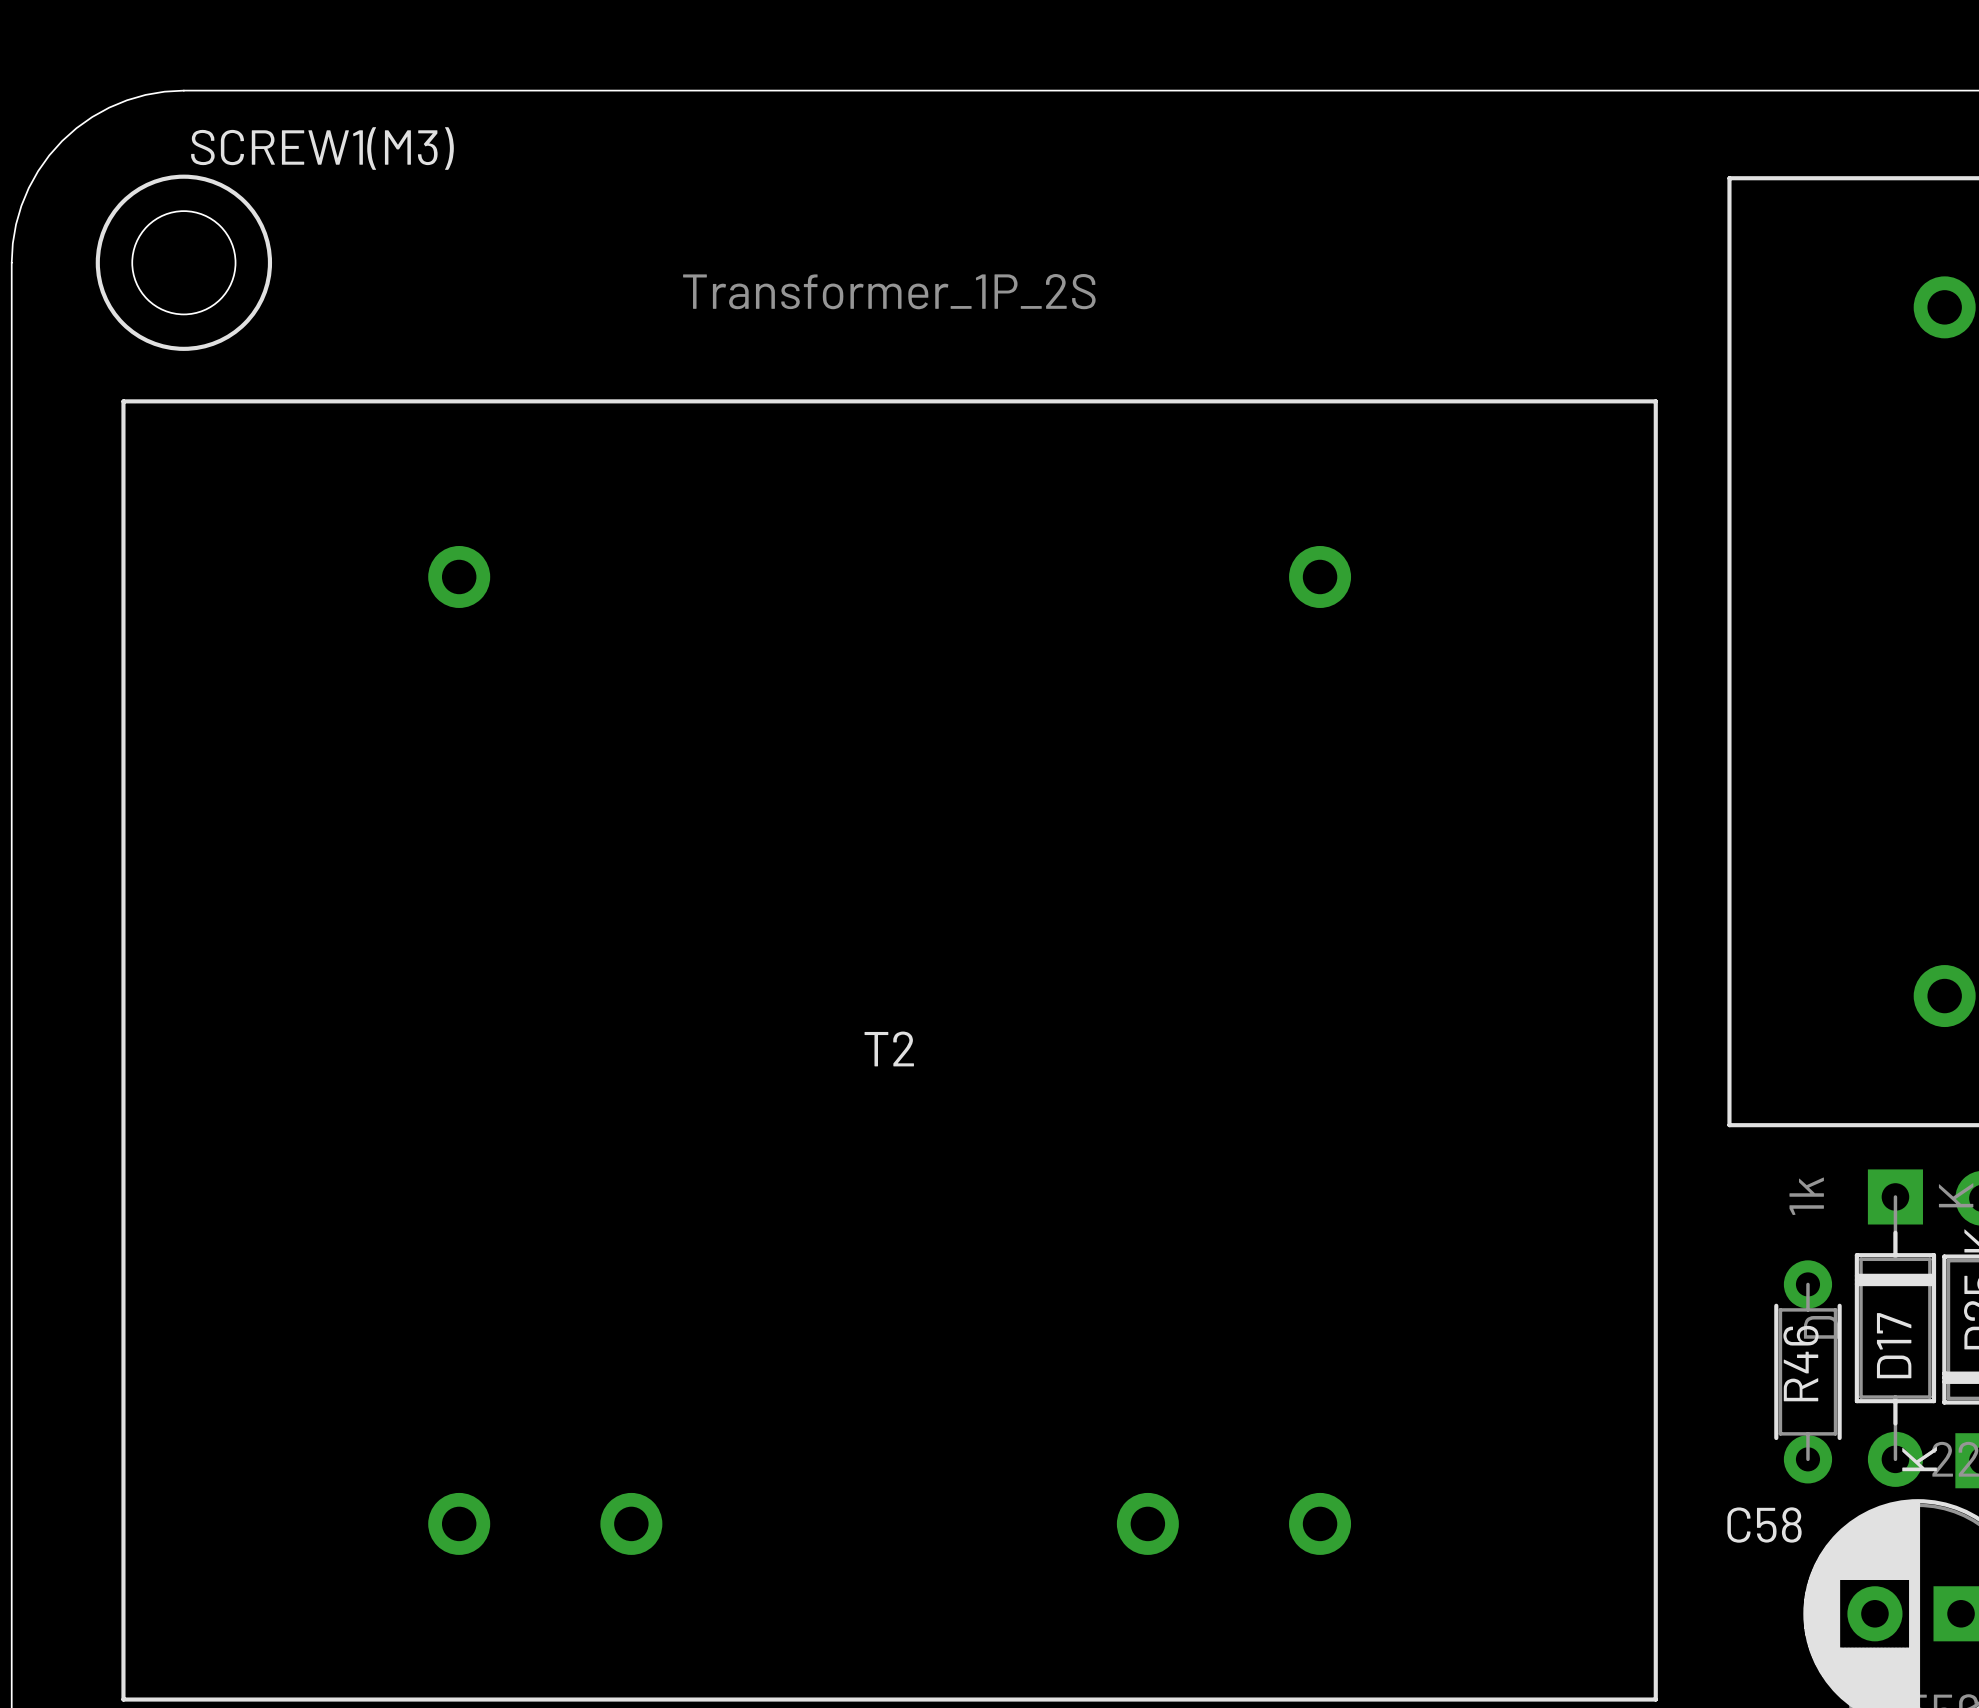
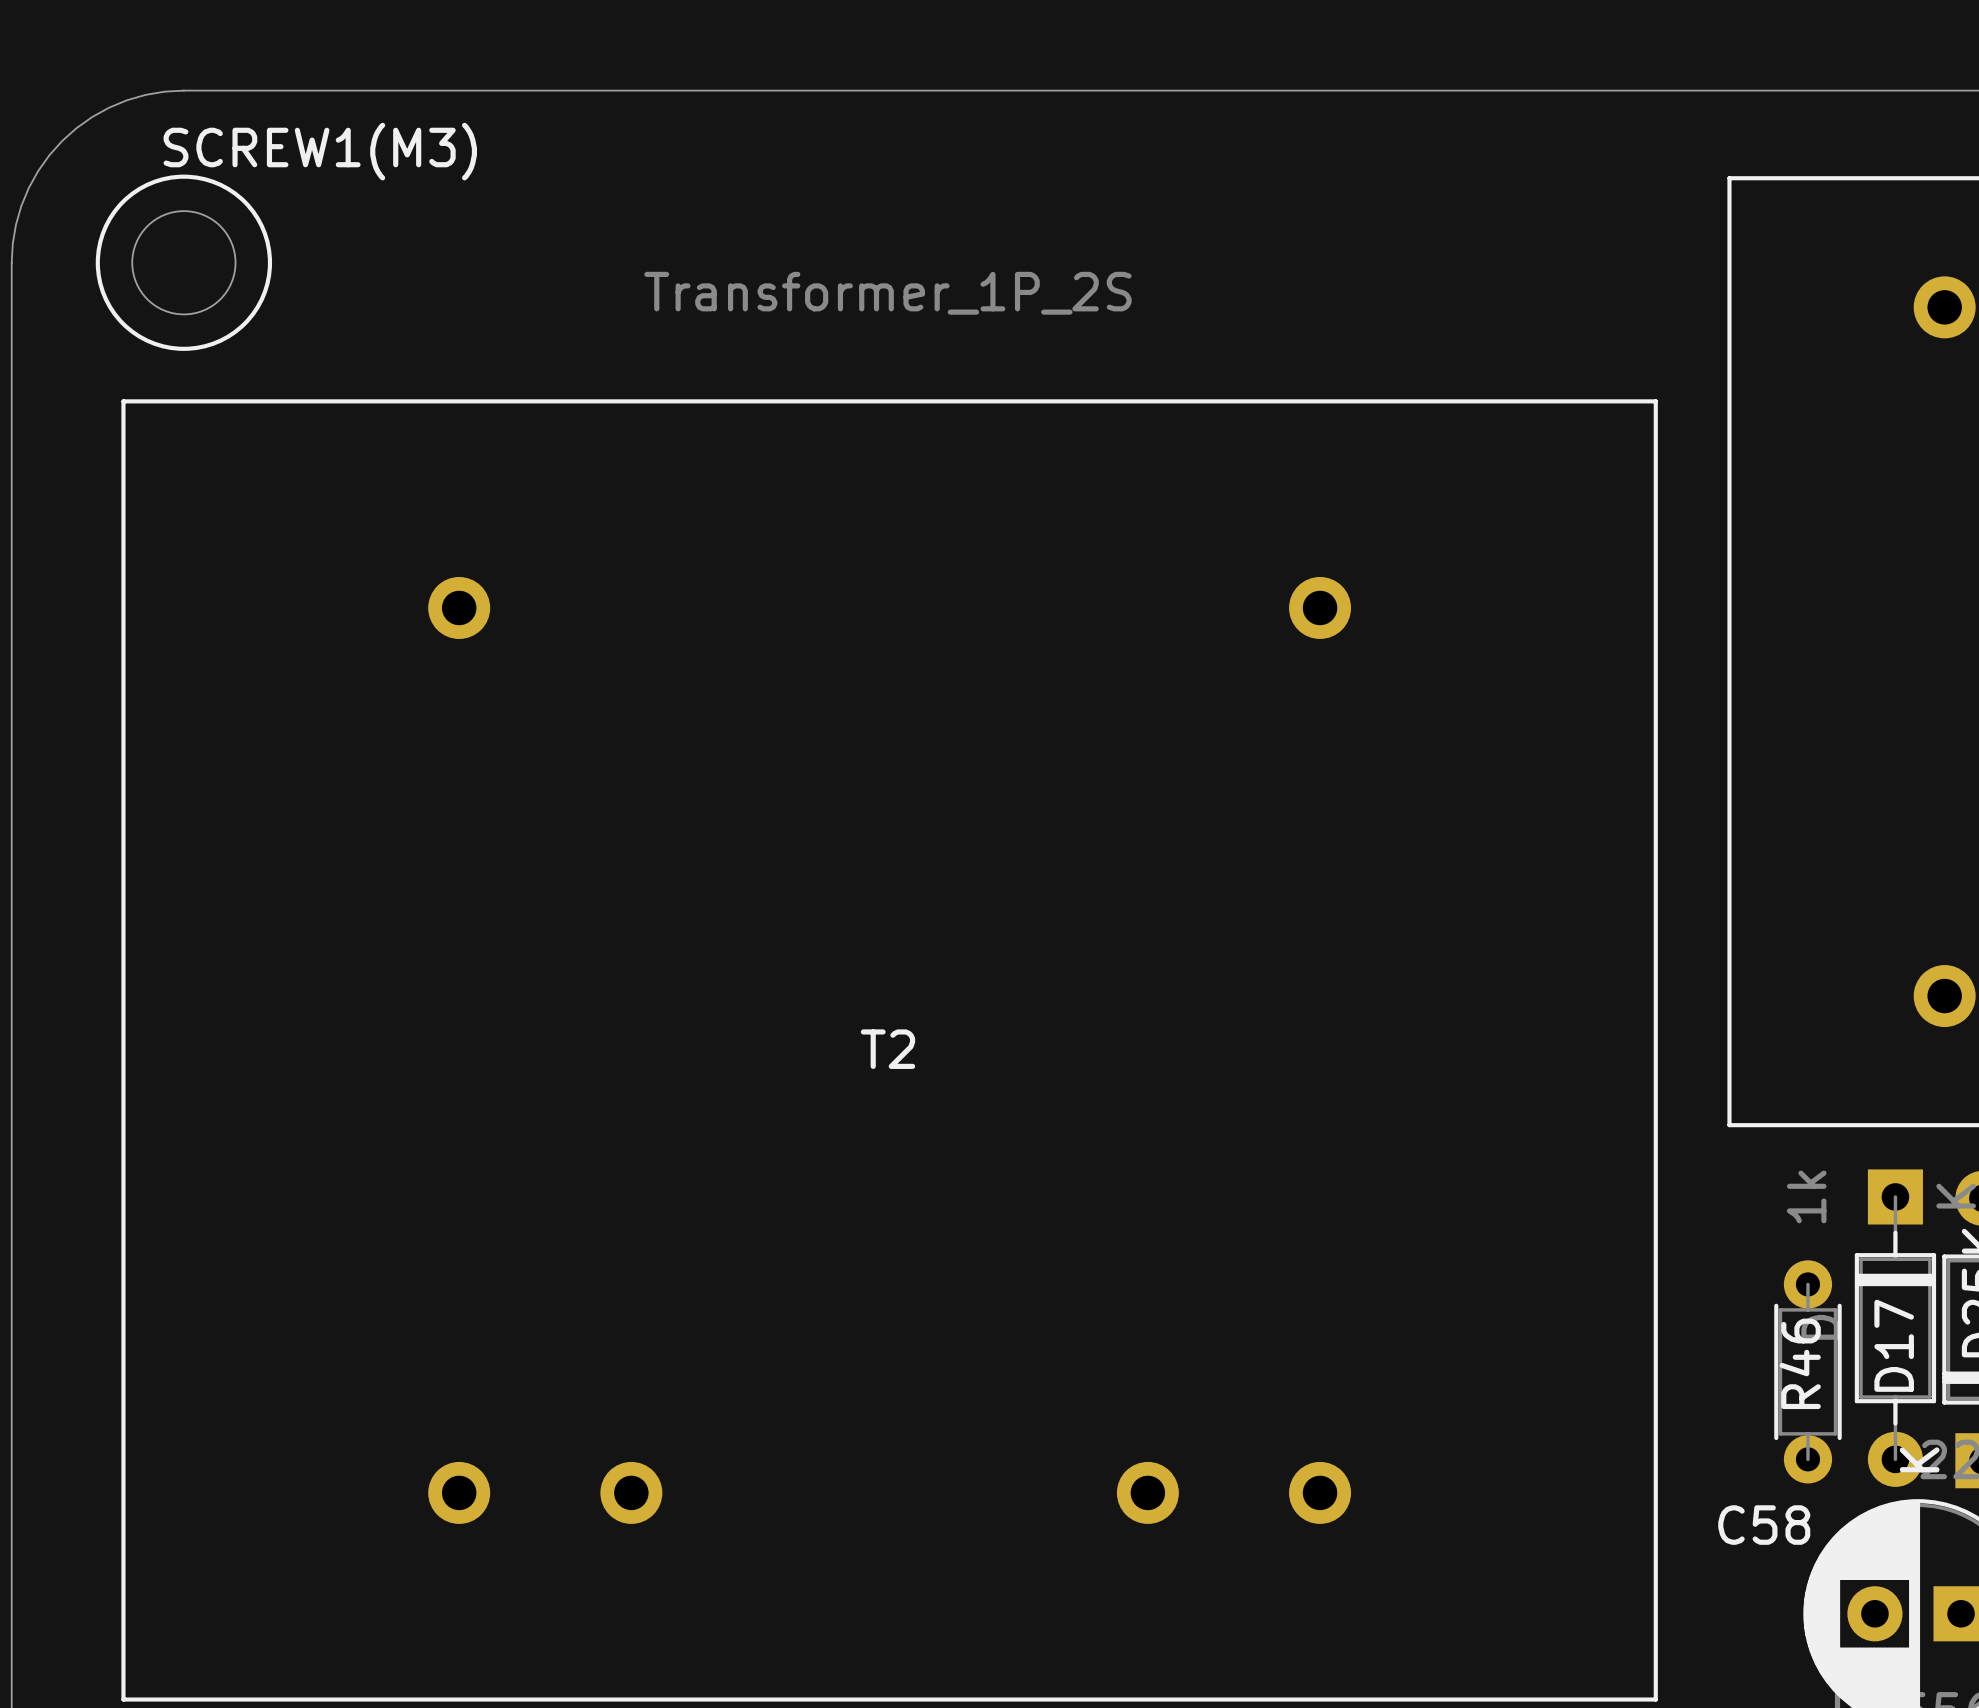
T2 footprint: [121, 399, 1658, 1702] -> [121, 399, 1658, 1702]

